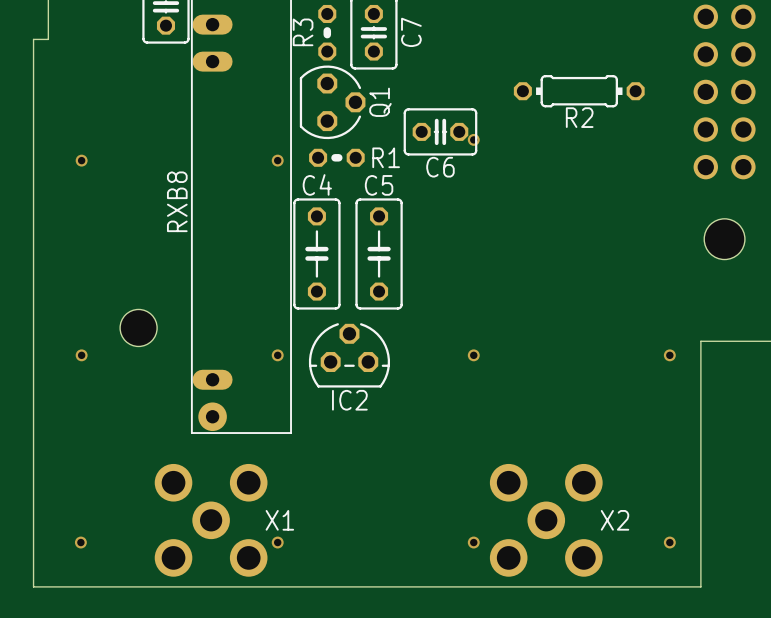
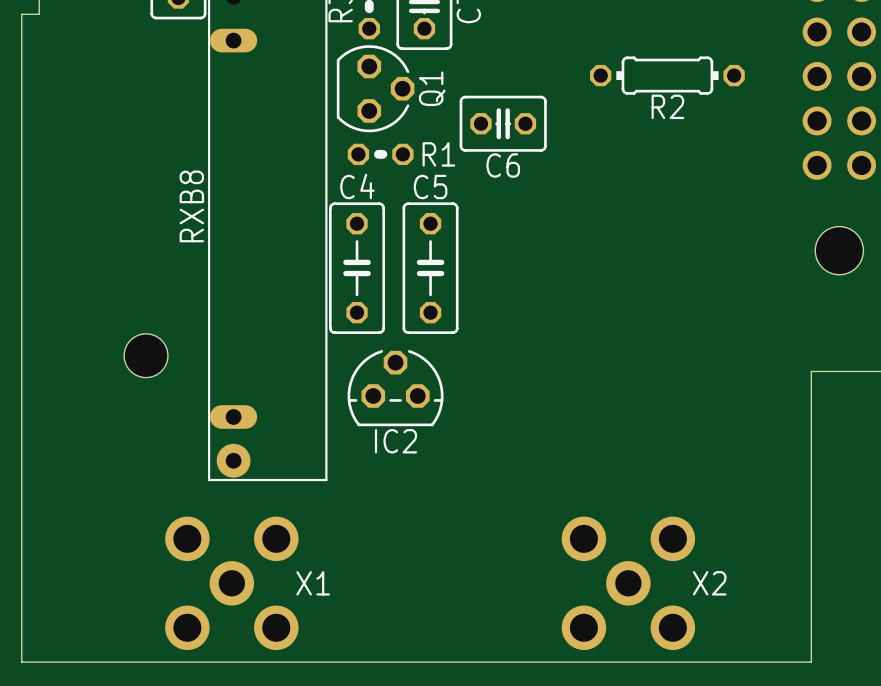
via: (473, 139) -> none
via: (81, 160) -> none
via: (277, 160) -> none
via: (81, 355) -> none
via: (277, 355) -> none
via: (473, 355) -> none
via: (669, 355) -> none
via: (80, 542) -> none
via: (277, 542) -> none
via: (473, 542) -> none
via: (669, 542) -> none

